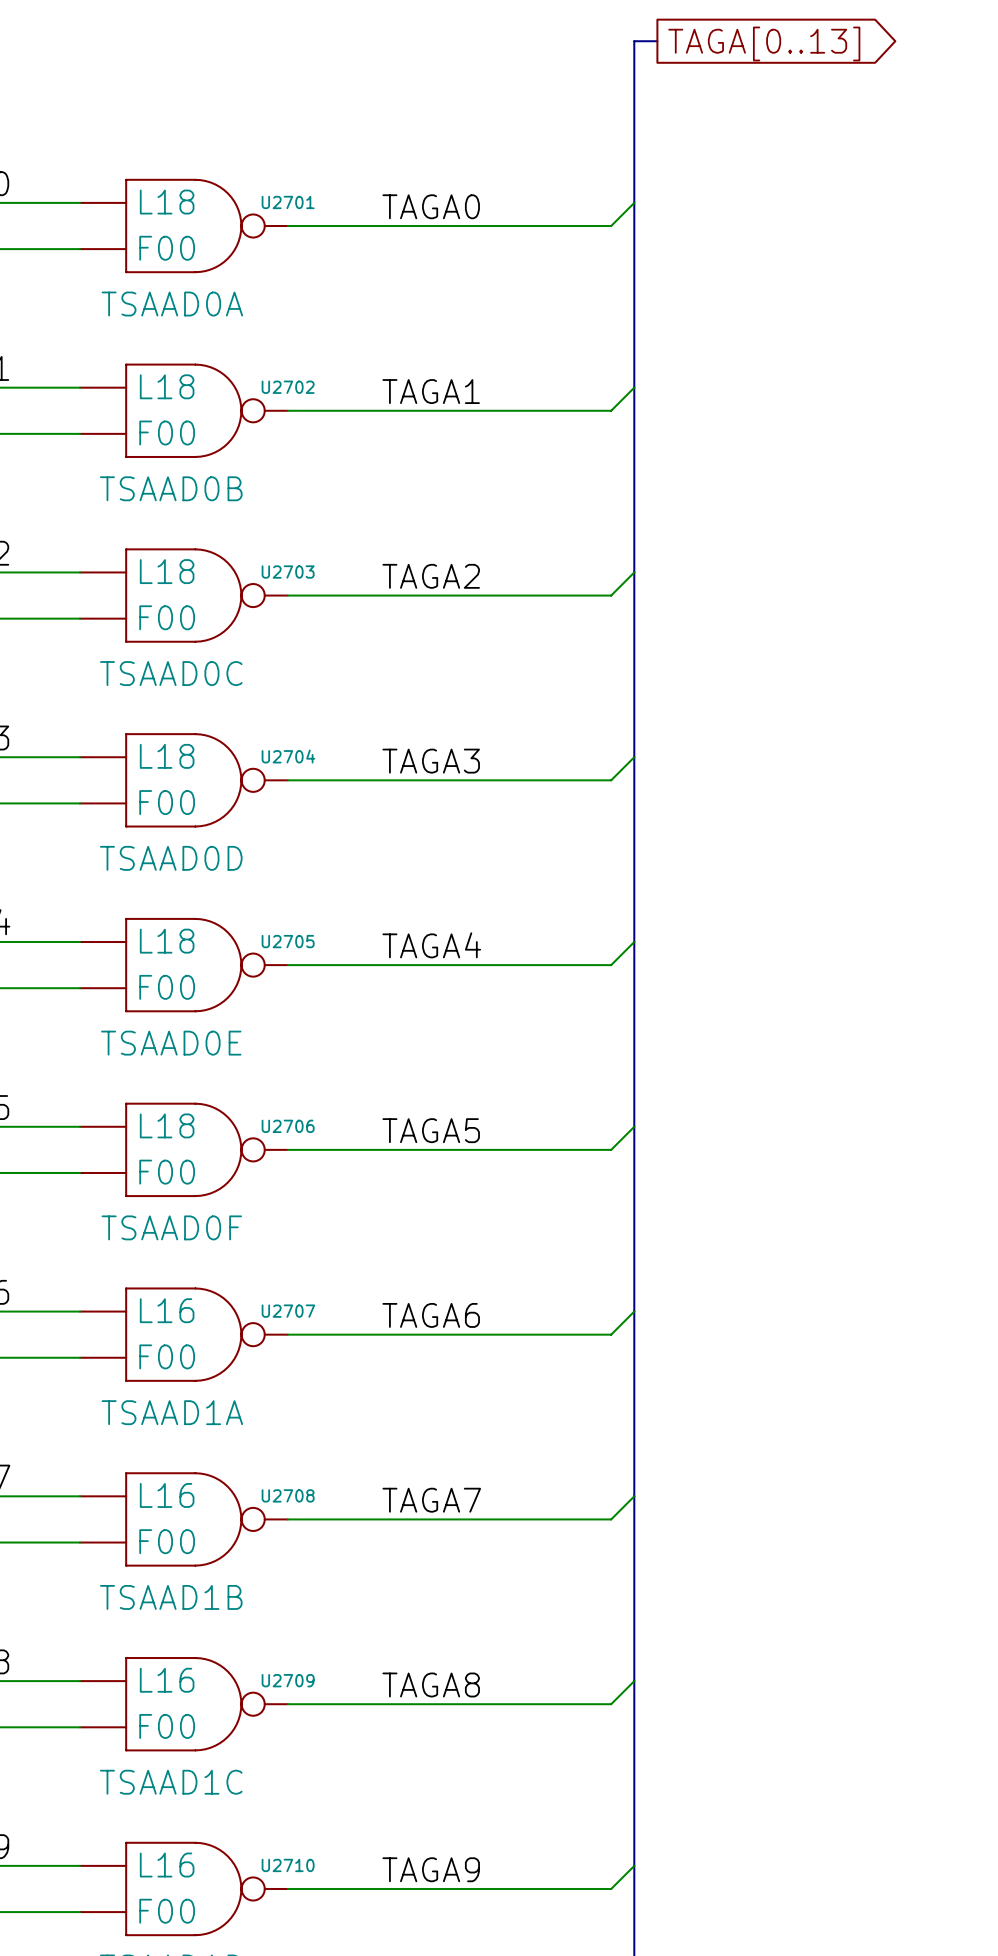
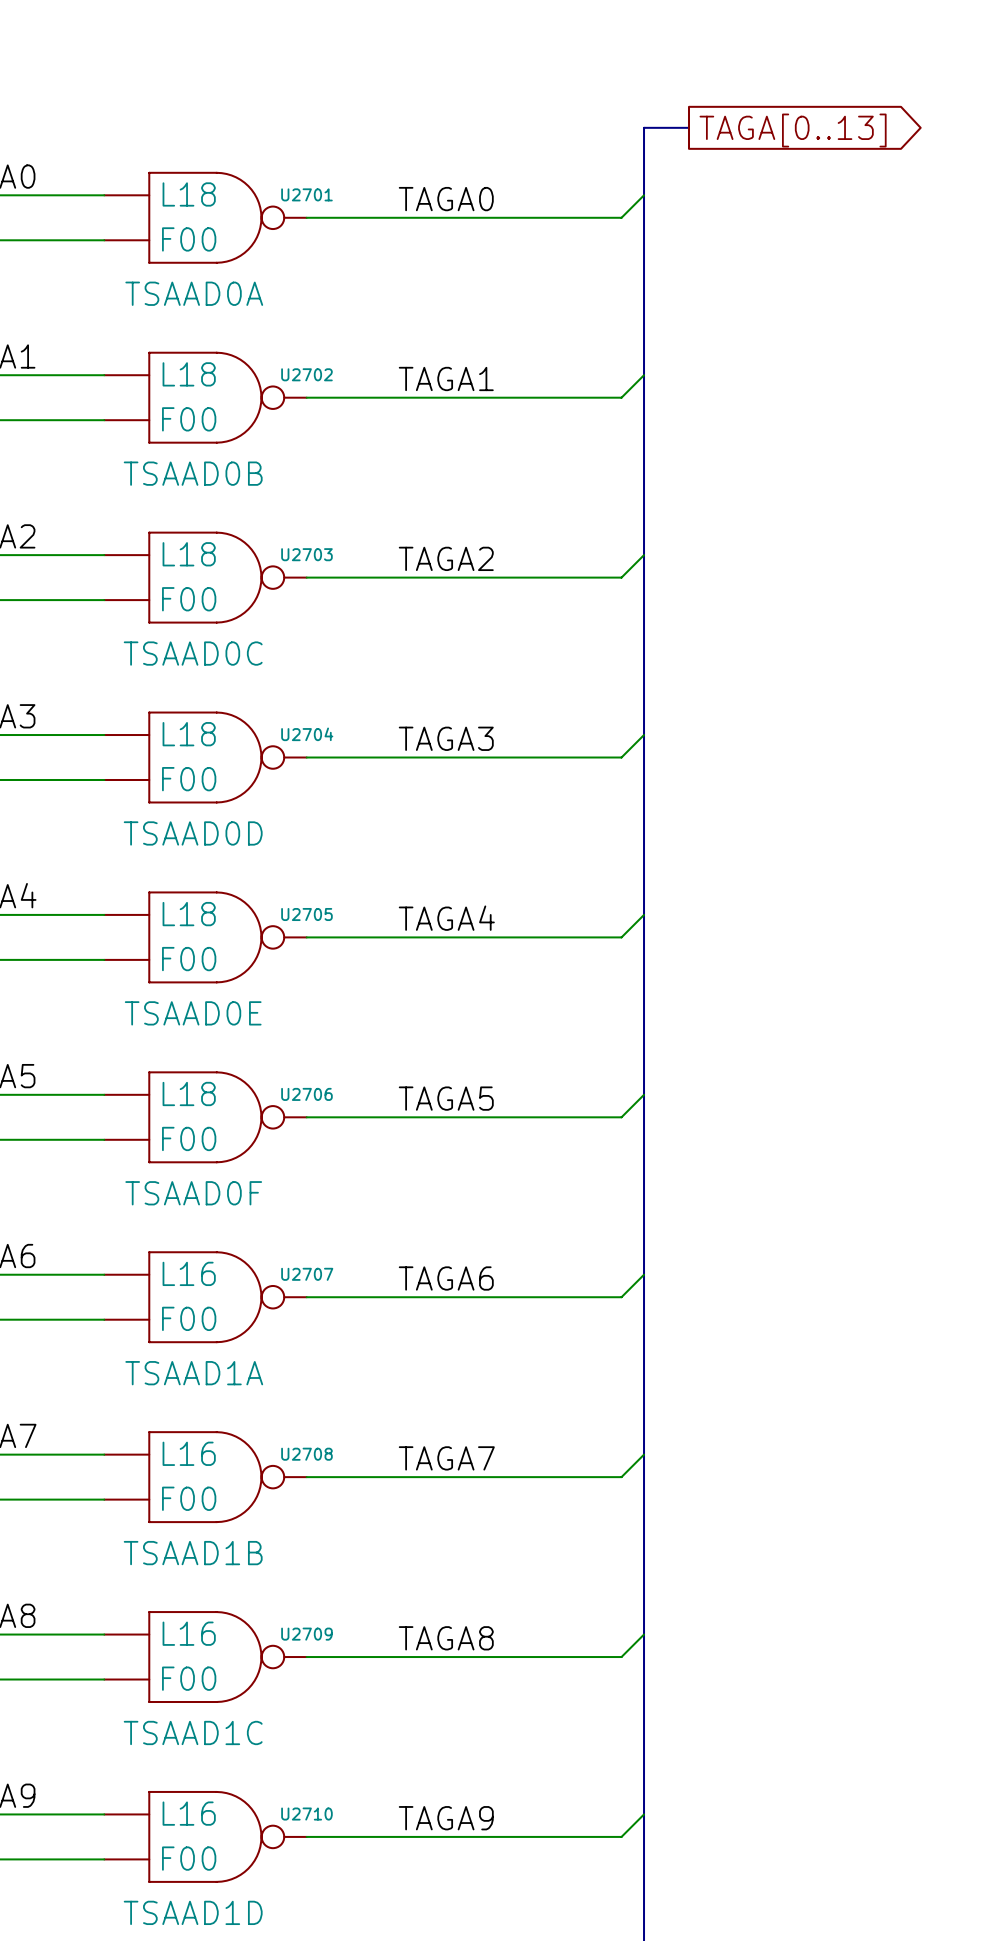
bus: (657, 41) (634, 41) (634, 133) -> (688, 127) (644, 127)
global label position: TAGA[0..13] (764, 43) -> TAGA[0..13] (793, 130)

